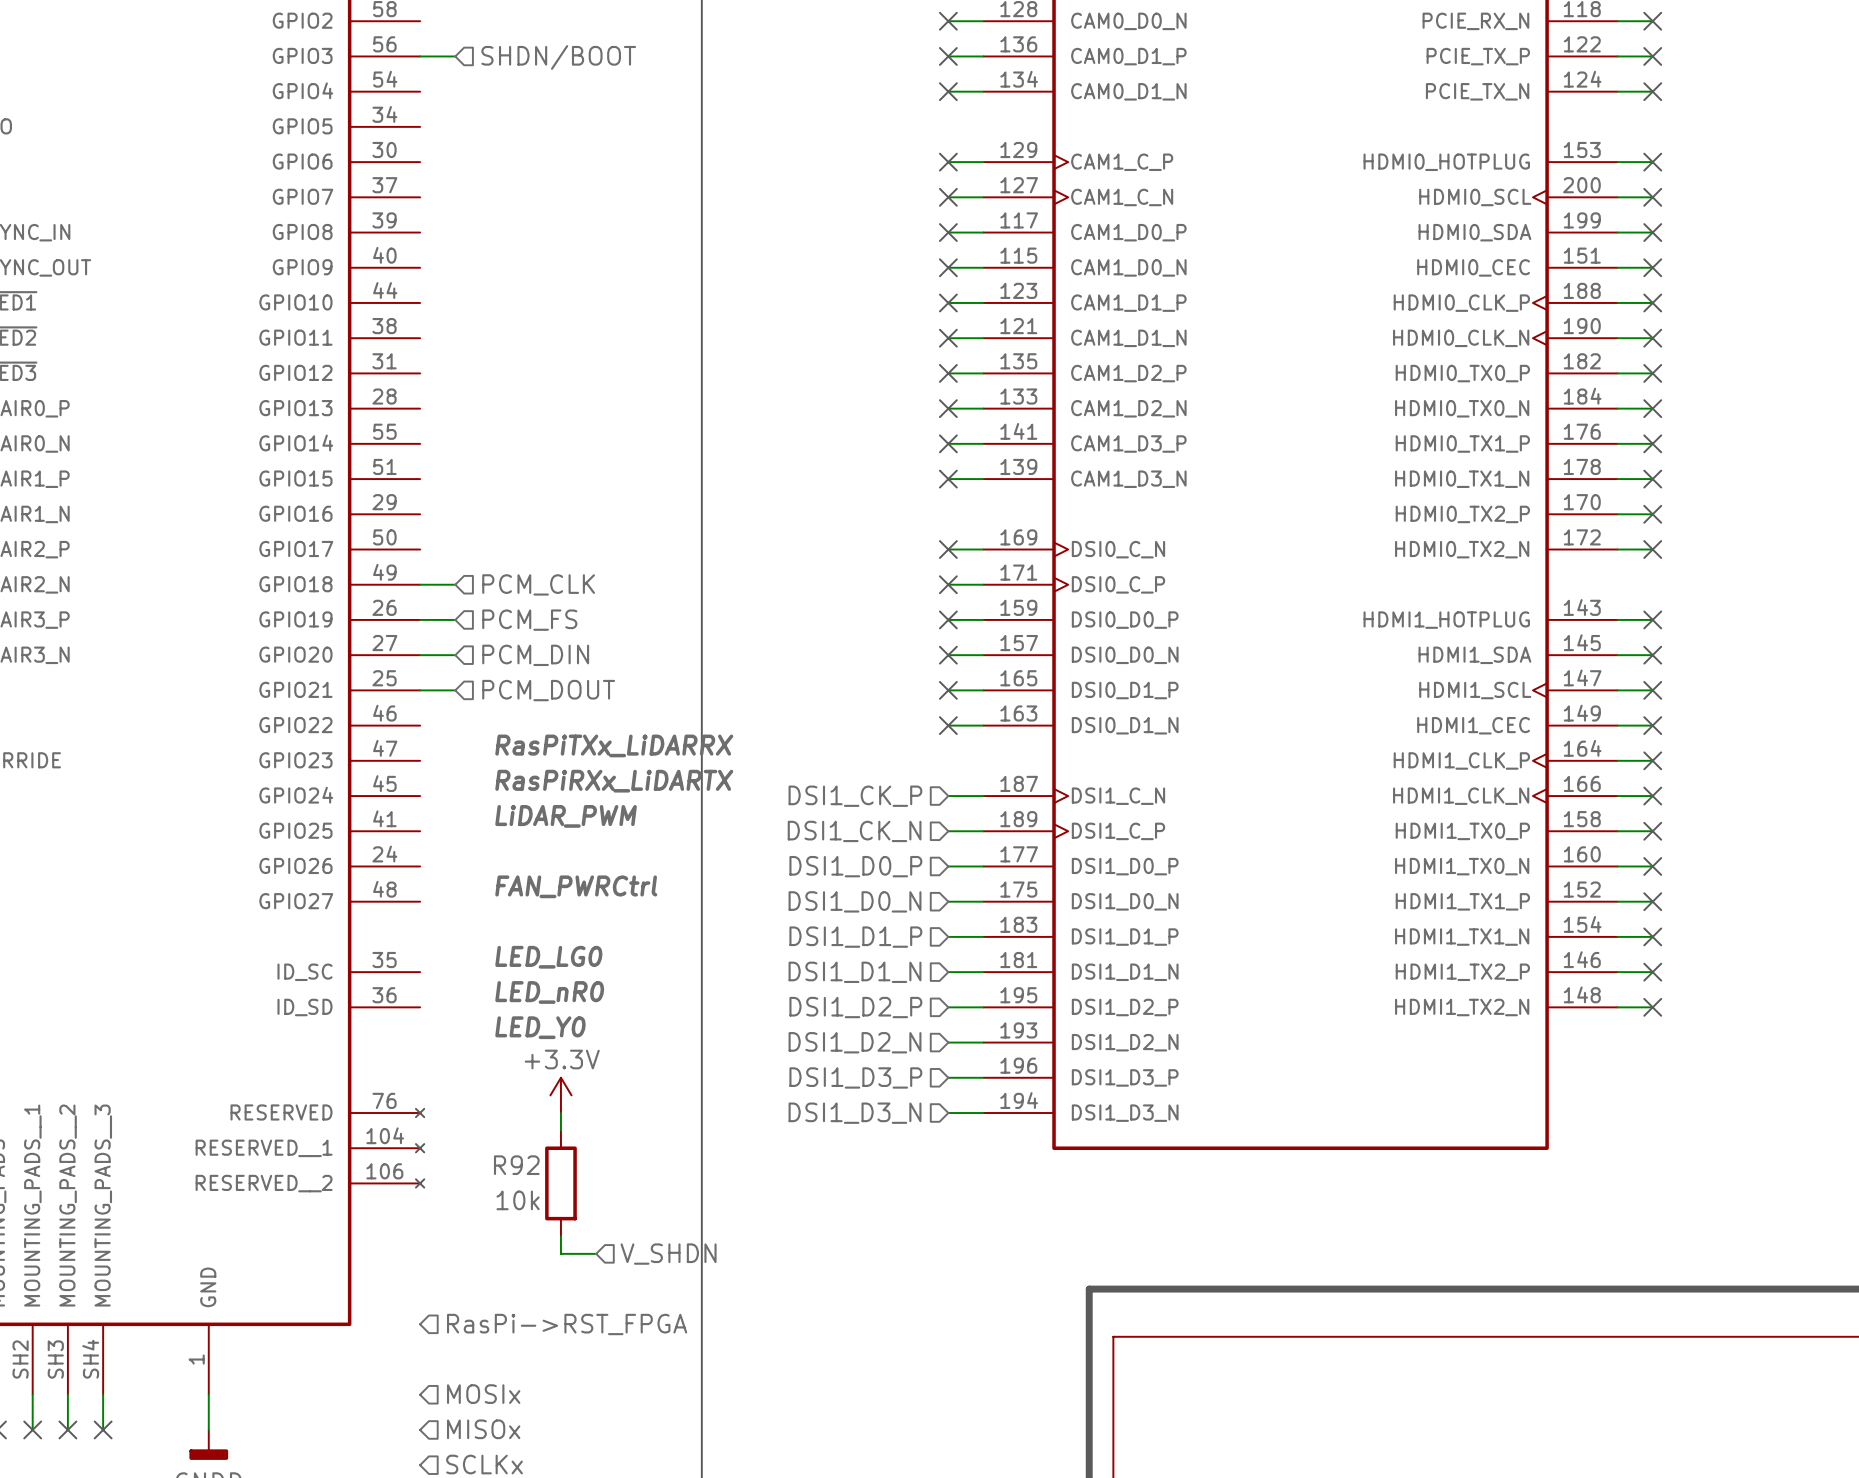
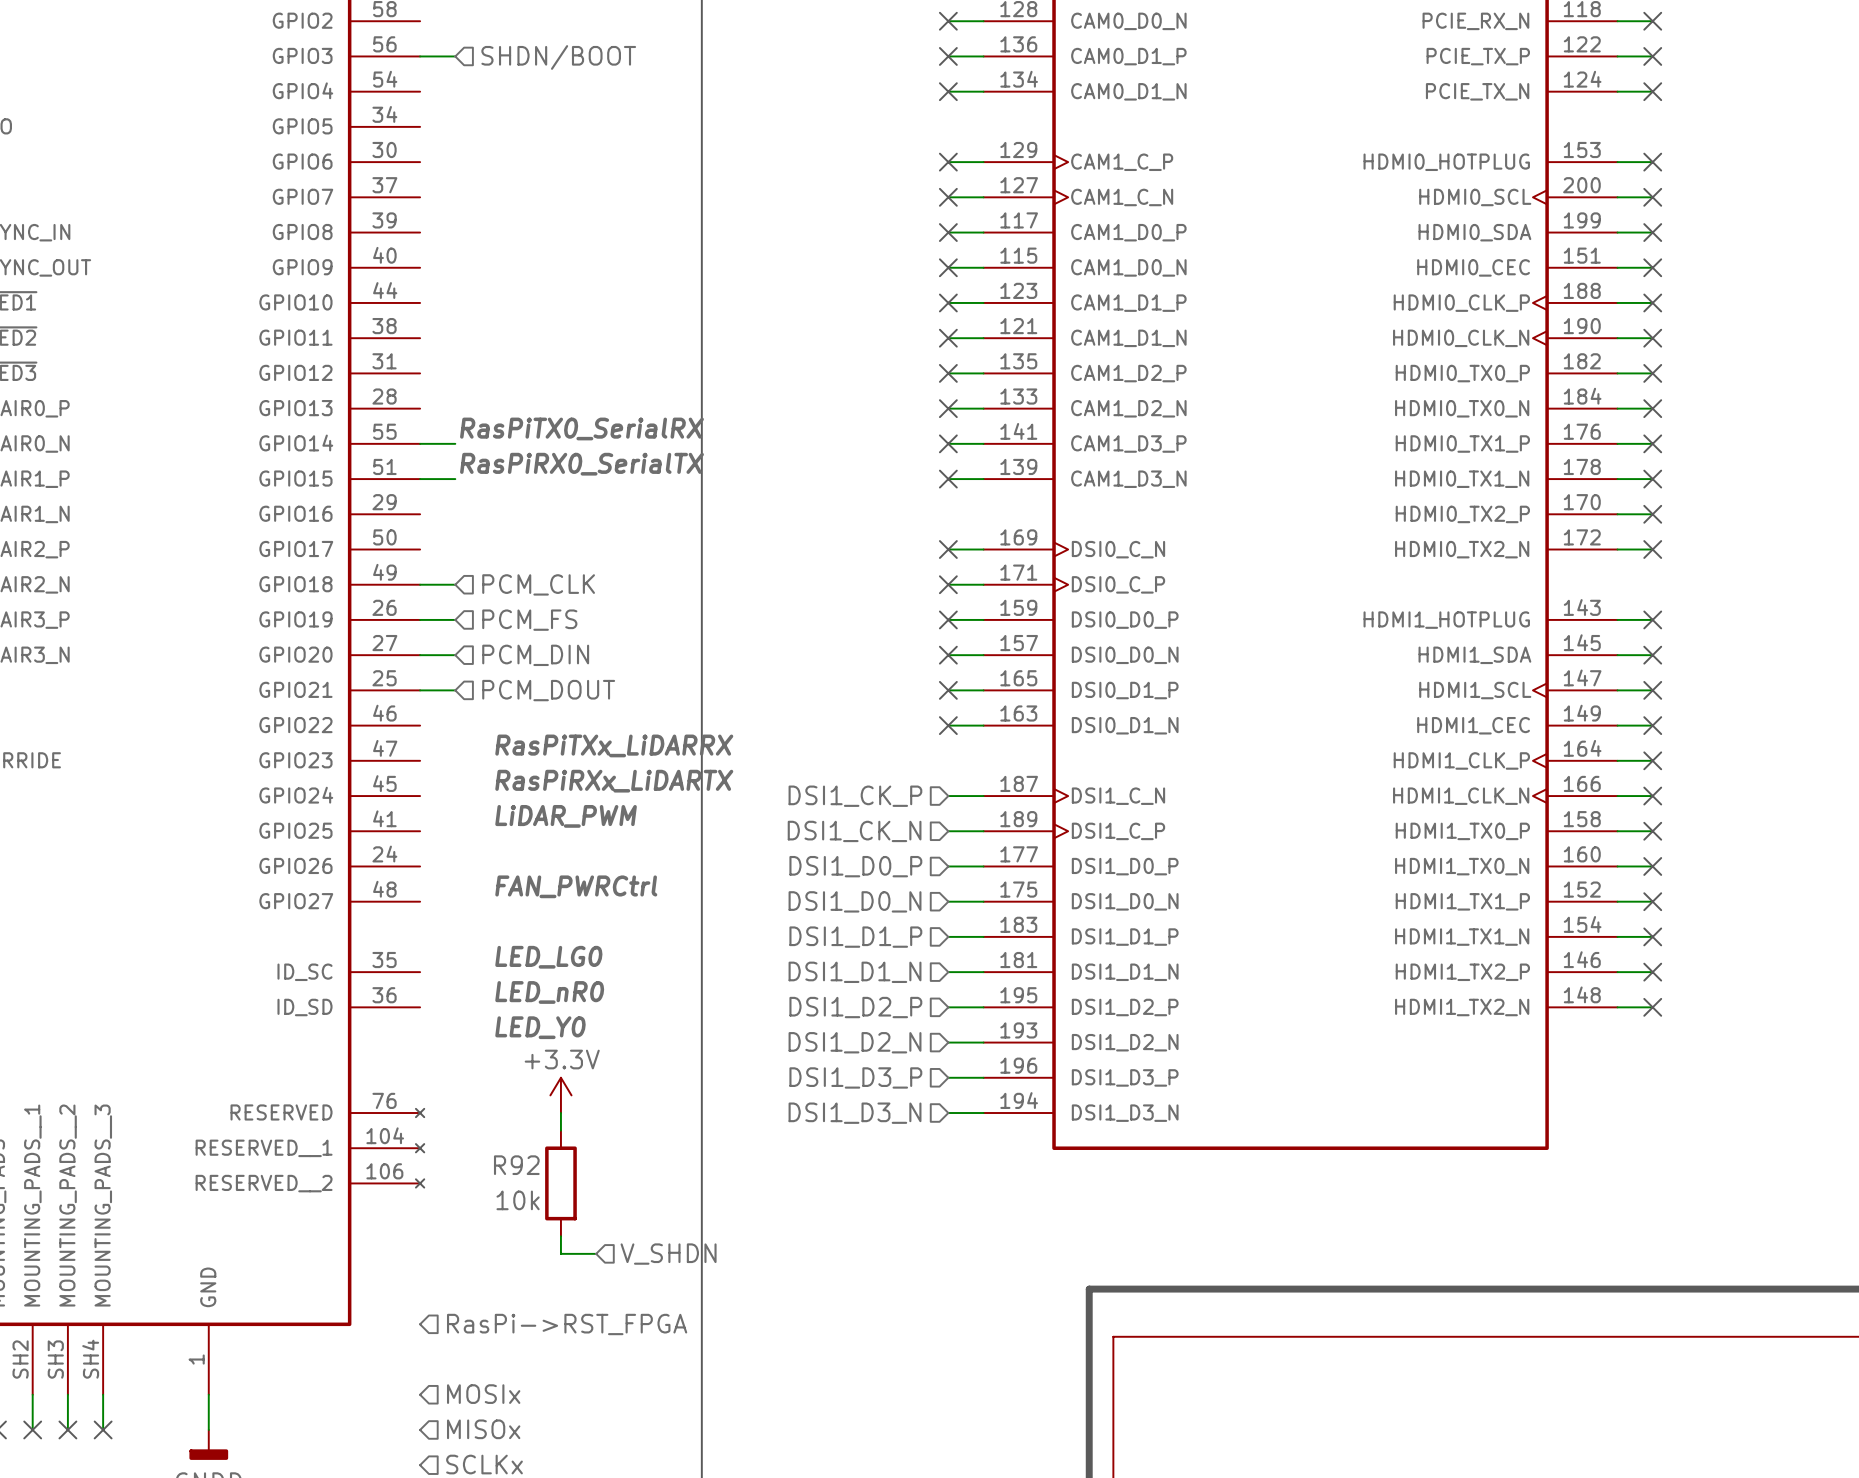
label: none -> RasPiTX0_SerialRX (581, 428)
wire: none -> (420, 443) (455, 443)
label: none -> RasPiRX0_SerialTX (581, 464)
wire: none -> (420, 479) (455, 479)

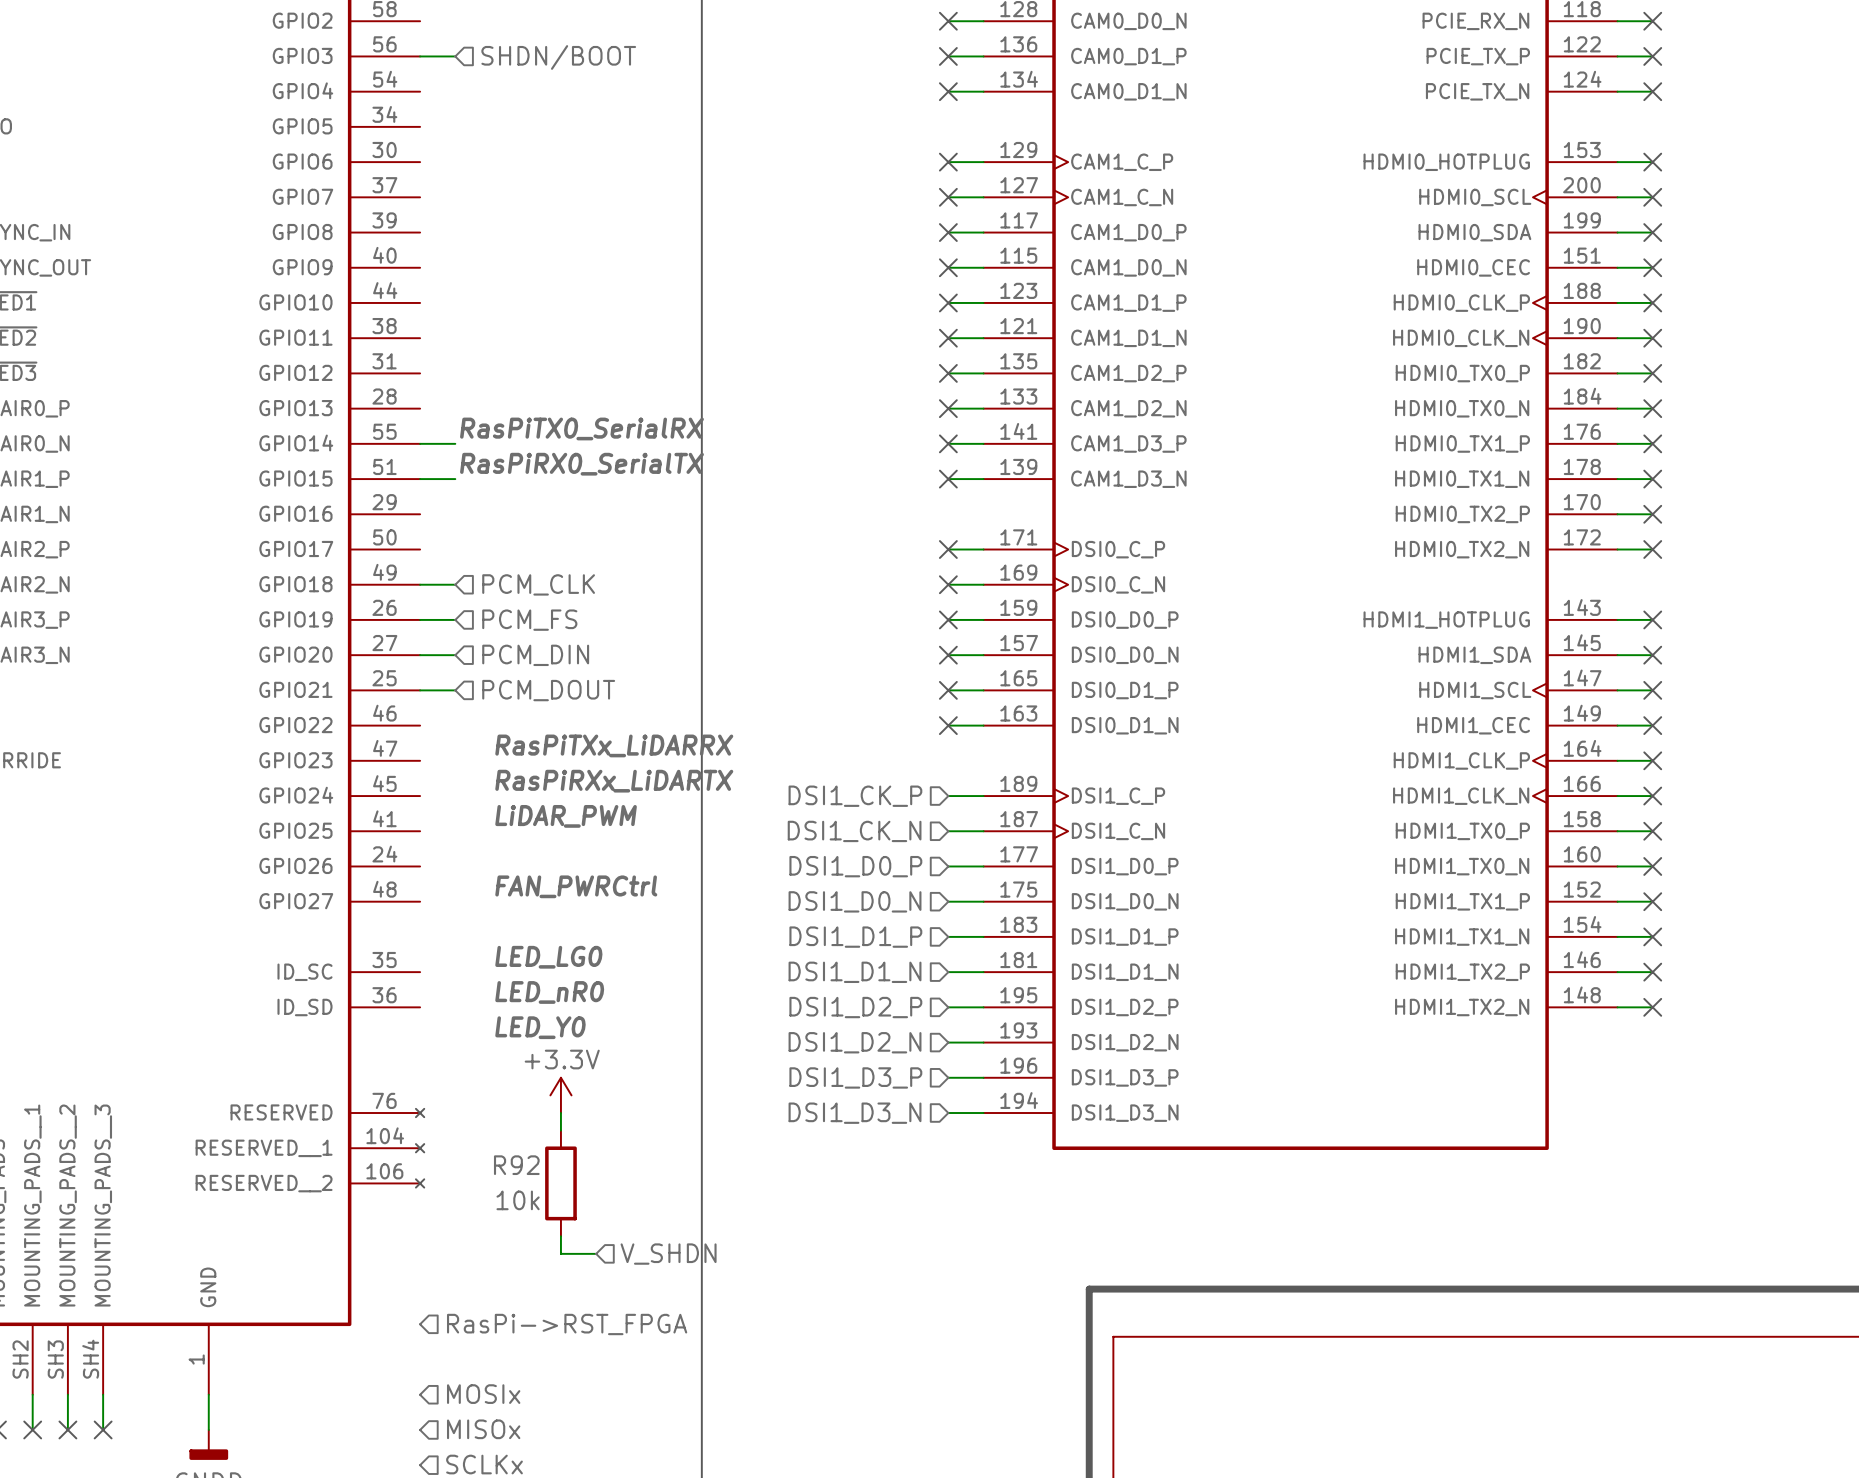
part pin number: 169 (1018, 537) -> 171 (1018, 537)
part pin name: DSI0_C_N (1118, 549) -> DSI0_C_P (1118, 549)
part pin number: 171 (1018, 572) -> 169 (1018, 572)
part pin name: DSI0_C_P (1118, 584) -> DSI0_C_N (1118, 584)
part pin number: 187 (1019, 783) -> 189 (1018, 783)
part pin name: DSI1_C_N (1118, 796) -> DSI1_C_P (1118, 796)
part pin number: 189 (1018, 819) -> 187 (1019, 819)
part pin name: DSI1_C_P (1118, 831) -> DSI1_C_N (1118, 831)

